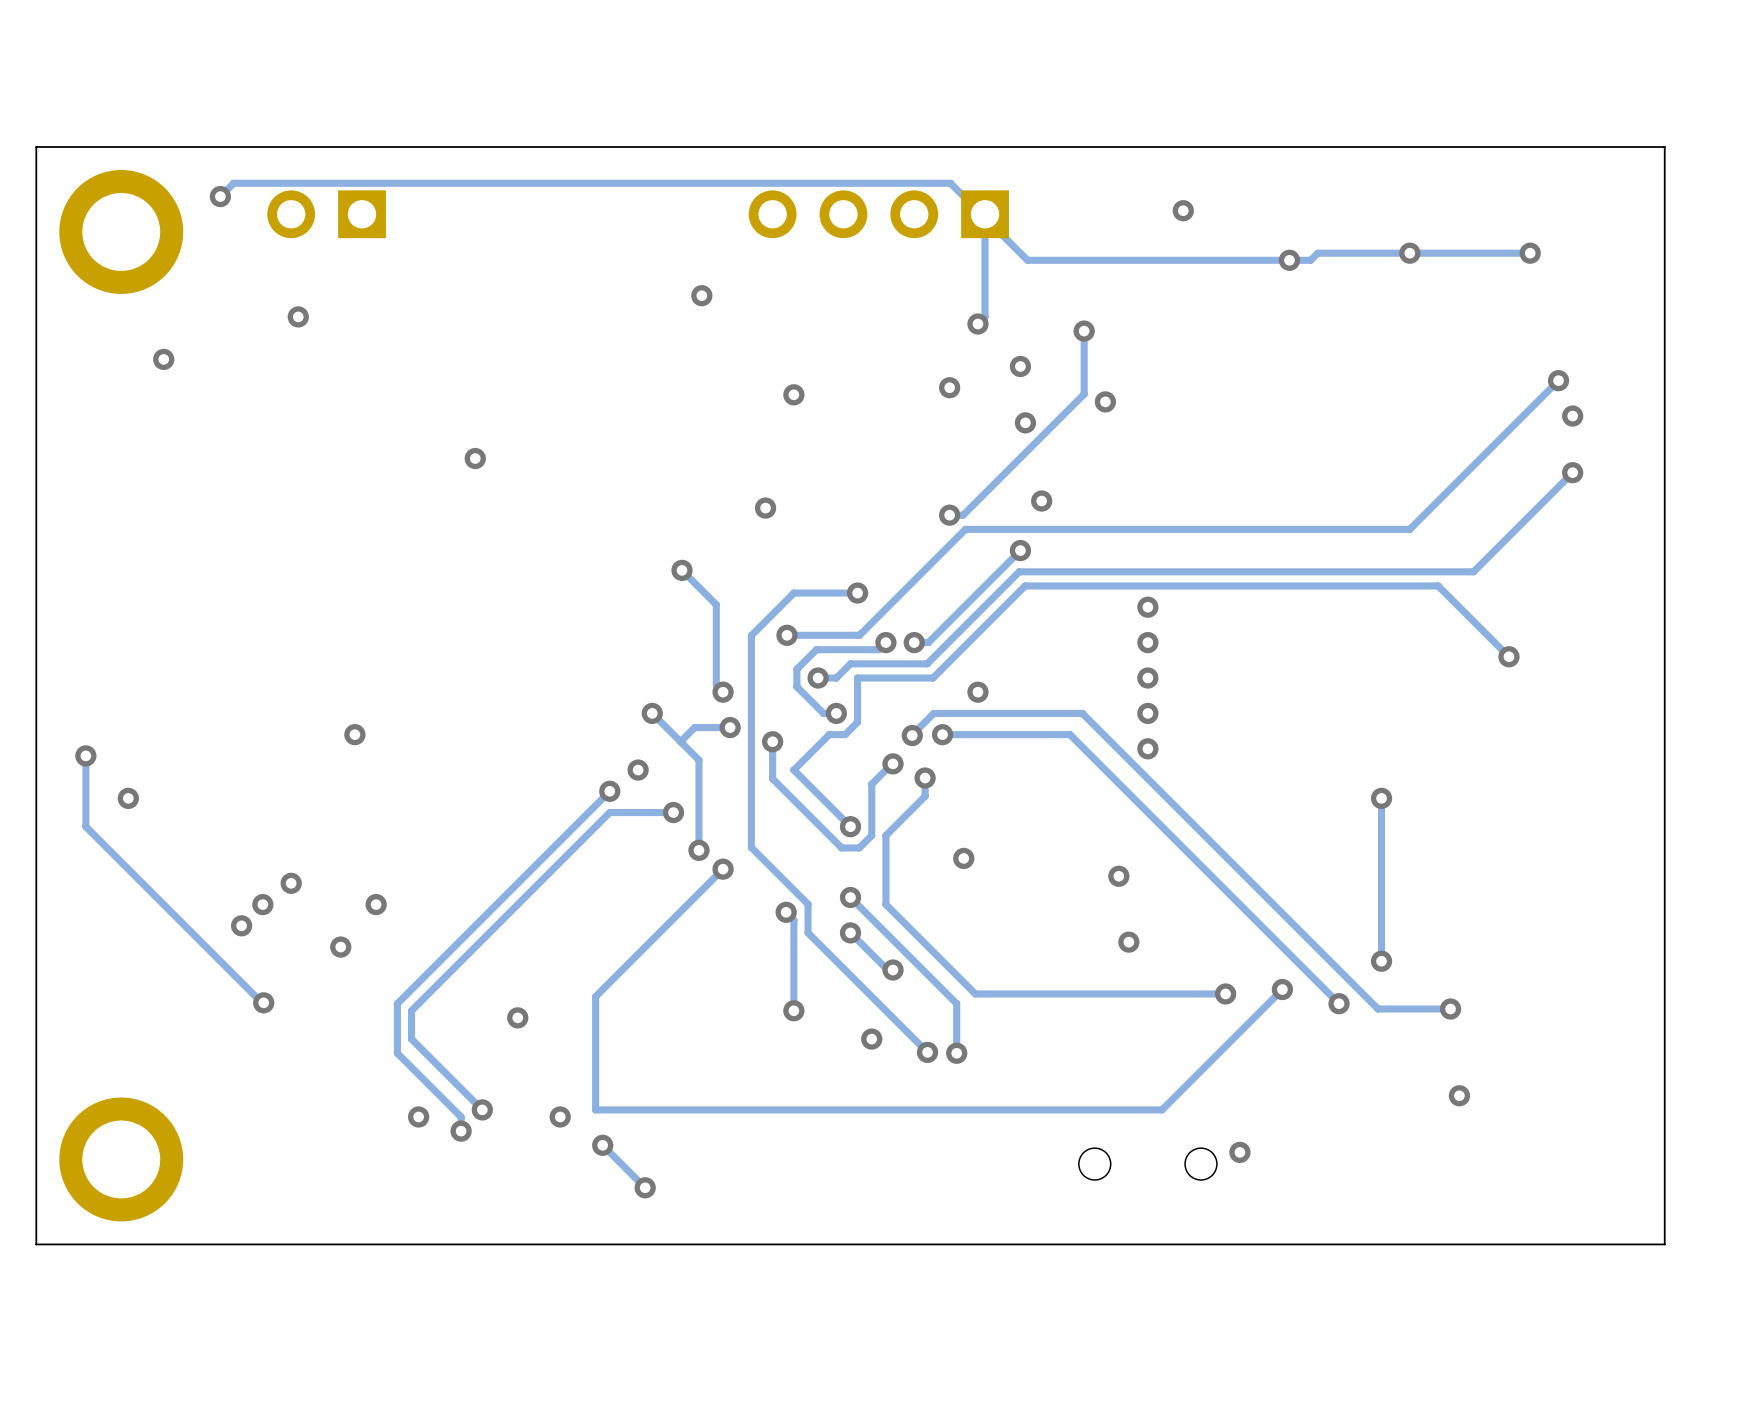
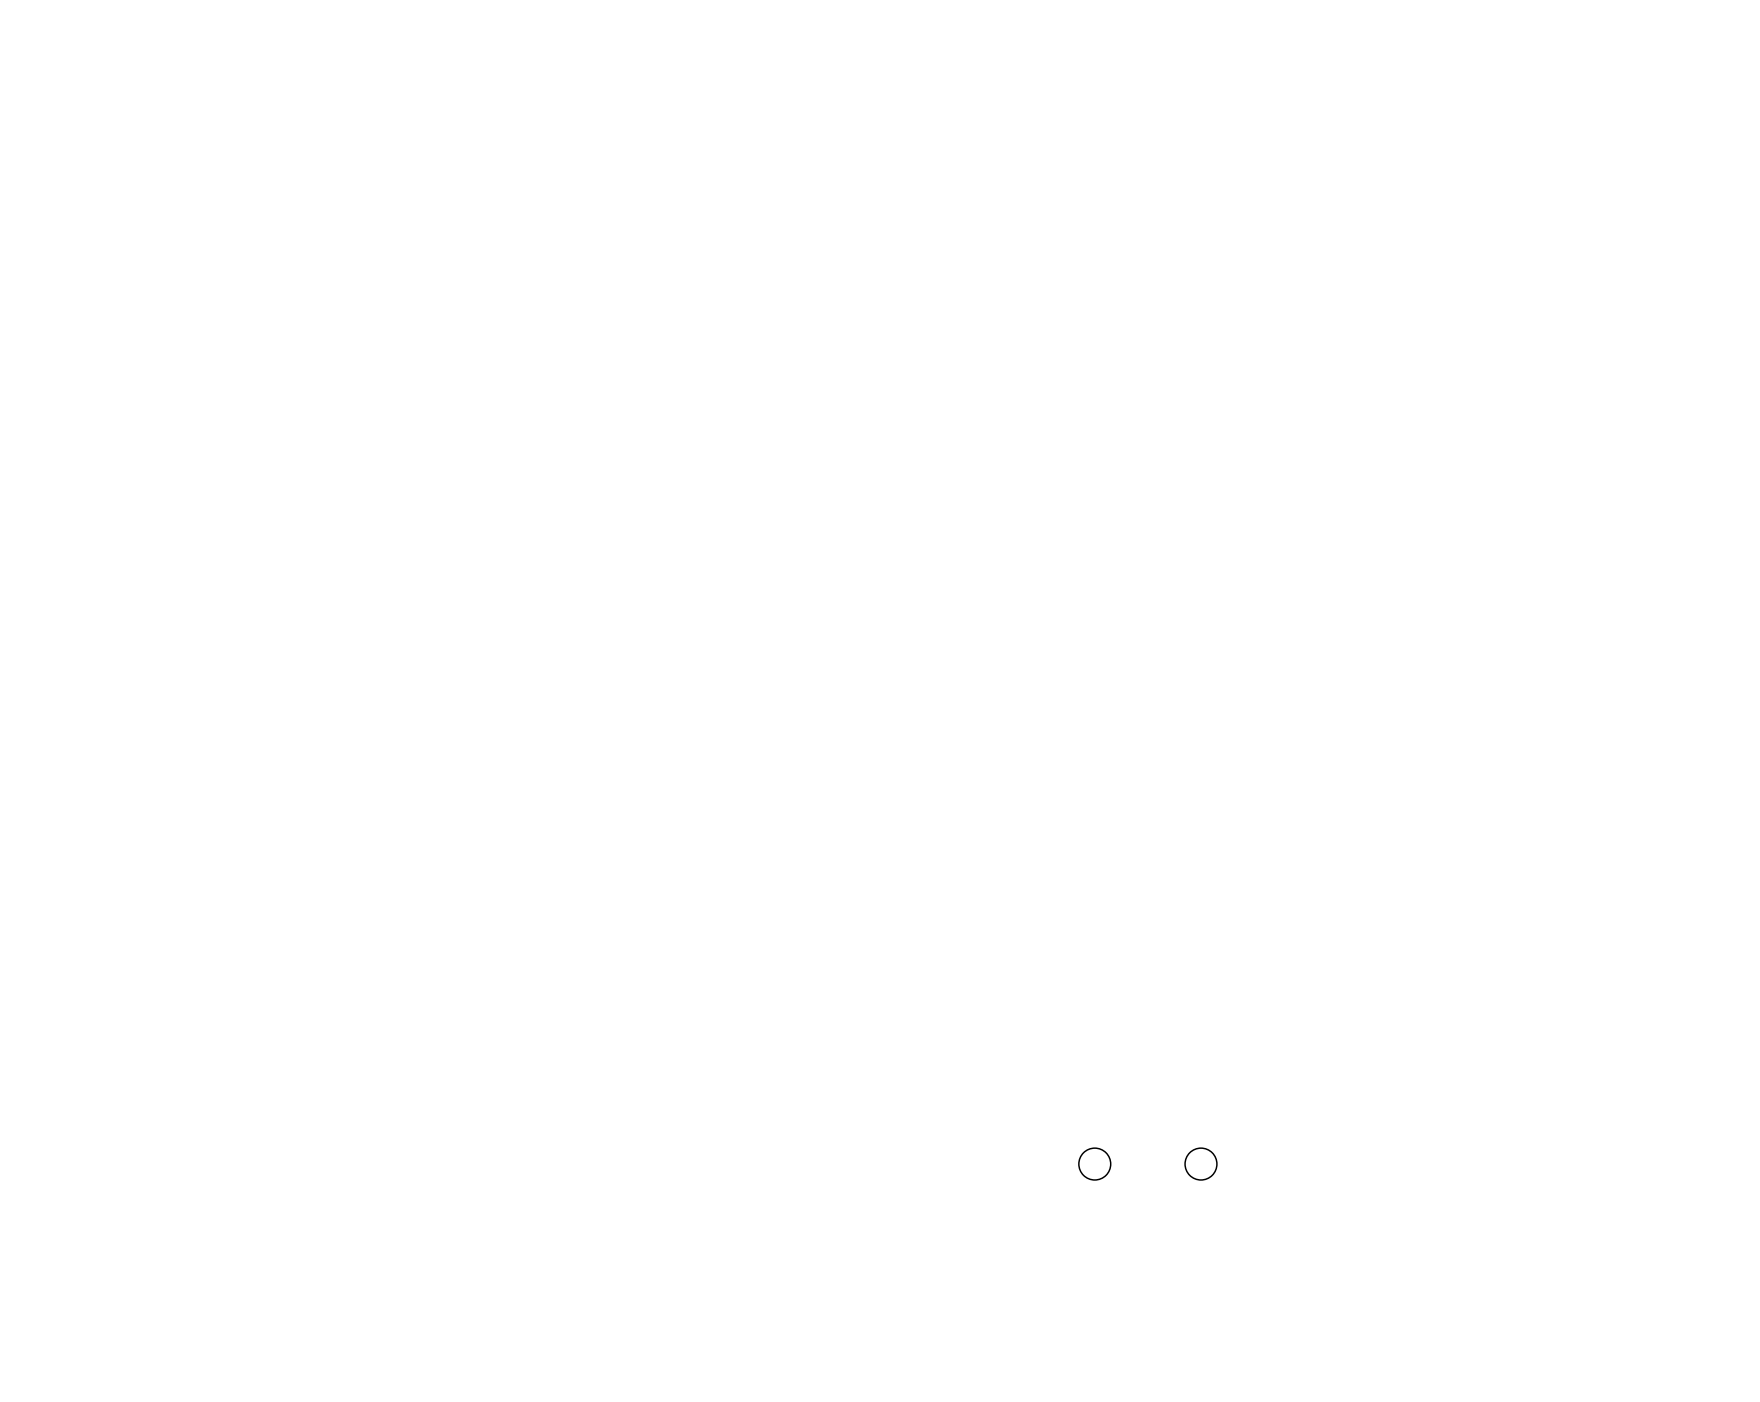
board edge: (1664, 147) (36, 147) (36, 1244) (1664, 1244) (1664, 147) -> none
track: (220, 196) (233, 183) (950, 183) (1027, 260) (1310, 260) (1317, 253) (1530, 253) -> none
via: (220, 196) -> none
via: (1183, 210) -> none
part: (326, 214) -> none
part: (878, 214) -> none
track: (985, 217) (985, 316) (977, 324) -> none
part: (121, 231) -> none
via: (1409, 253) -> none
via: (1530, 253) -> none
via: (1289, 260) -> none
via: (701, 295) -> none
via: (298, 316) -> none
via: (977, 324) -> none
track: (1084, 331) (1084, 394) (963, 515) (949, 515) -> none
via: (1084, 331) -> none
via: (163, 359) -> none
via: (1020, 366) -> none
track: (1558, 380) (1409, 529) (965, 529) (859, 635) (787, 635) -> none
via: (1558, 380) -> none
via: (949, 387) -> none
via: (793, 394) -> none
via: (1105, 401) -> none
via: (1572, 416) -> none
via: (1025, 422) -> none
via: (475, 458) -> none
track: (1572, 472) (1473, 571) (1019, 571) (927, 663) (850, 663) (836, 678) (818, 678) -> none
via: (1572, 472) -> none
via: (1041, 501) -> none
via: (765, 508) -> none
via: (949, 515) -> none
track: (1020, 550) (928, 642) (914, 642) -> none
via: (1020, 550) -> none
track: (682, 570) (716, 604) (716, 685) (723, 692) -> none
via: (682, 570) -> none
track: (857, 593) (793, 593) (751, 635) (751, 847) (808, 904) (808, 932) (927, 1052) -> none
via: (857, 593) -> none
via: (1147, 607) -> none
via: (787, 635) -> none
track: (885, 642) (878, 649) (816, 649) (796, 669) (796, 686) (823, 713) (836, 713) -> none
via: (885, 642) -> none
via: (914, 642) -> none
via: (1147, 642) -> none
track: (1508, 656) (1438, 585) (1025, 585) (933, 678) (857, 678) (857, 722) (845, 734) (829, 734) (793, 770) (850, 826) -> none
via: (1508, 656) -> none
via: (818, 678) -> none
via: (1147, 678) -> none
via: (723, 692) -> none
via: (977, 692) -> none
track: (652, 713) (698, 760) (698, 850) -> none
via: (652, 713) -> none
via: (836, 713) -> none
via: (1147, 713) -> none
track: (730, 727) (694, 727) (680, 741) -> none
via: (730, 727) -> none
via: (354, 734) -> none
track: (912, 734) (933, 713) (1082, 713) (1378, 1009) (1450, 1009) -> none
track: (942, 734) (1070, 734) (1339, 1003) -> none
via: (942, 734) -> none
via: (912, 735) -> none
track: (772, 741) (772, 778) (841, 847) (859, 847) (871, 835) (871, 784) (893, 763) -> none
via: (772, 741) -> none
via: (1147, 748) -> none
track: (85, 755) (85, 826) (263, 1002) -> none
via: (85, 755) -> none
via: (893, 763) -> none
via: (638, 770) -> none
track: (925, 778) (925, 796) (885, 835) (885, 904) (975, 993) (1225, 993) -> none
via: (925, 778) -> none
track: (609, 791) (397, 1003) (397, 1053) (461, 1116) (461, 1131) -> none
via: (609, 791) -> none
via: (128, 798) -> none
track: (1381, 798) (1381, 961) -> none
via: (1381, 798) -> none
via: (673, 812) -> none
track: (676, 812) (609, 812) (411, 1010) (411, 1039) (482, 1109) -> none
via: (850, 826) -> none
via: (698, 850) -> none
via: (963, 858) -> none
track: (723, 869) (595, 996) (595, 1109) (1162, 1109) (1282, 989) -> none
via: (723, 869) -> none
via: (1118, 876) -> none
via: (291, 883) -> none
track: (850, 897) (956, 1003) (956, 1053) -> none
via: (850, 897) -> none
via: (262, 904) -> none
via: (376, 904) -> none
track: (786, 912) (793, 920) (793, 1010) -> none
via: (786, 912) -> none
via: (241, 925) -> none
track: (850, 932) (887, 970) (893, 970) -> none
via: (850, 932) -> none
via: (1128, 942) -> none
via: (340, 947) -> none
via: (1381, 961) -> none
via: (893, 970) -> none
via: (1282, 989) -> none
via: (1225, 993) -> none
via: (263, 1002) -> none
via: (1339, 1003) -> none
via: (1450, 1009) -> none
via: (793, 1010) -> none
via: (517, 1017) -> none
via: (871, 1039) -> none
via: (927, 1052) -> none
via: (956, 1053) -> none
via: (1459, 1095) -> none
via: (482, 1109) -> none
via: (418, 1116) -> none
via: (560, 1116) -> none
via: (461, 1131) -> none
track: (602, 1145) (645, 1187) -> none
via: (602, 1145) -> none
via: (1239, 1152) -> none
part: (121, 1159) -> none
via: (645, 1187) -> none

